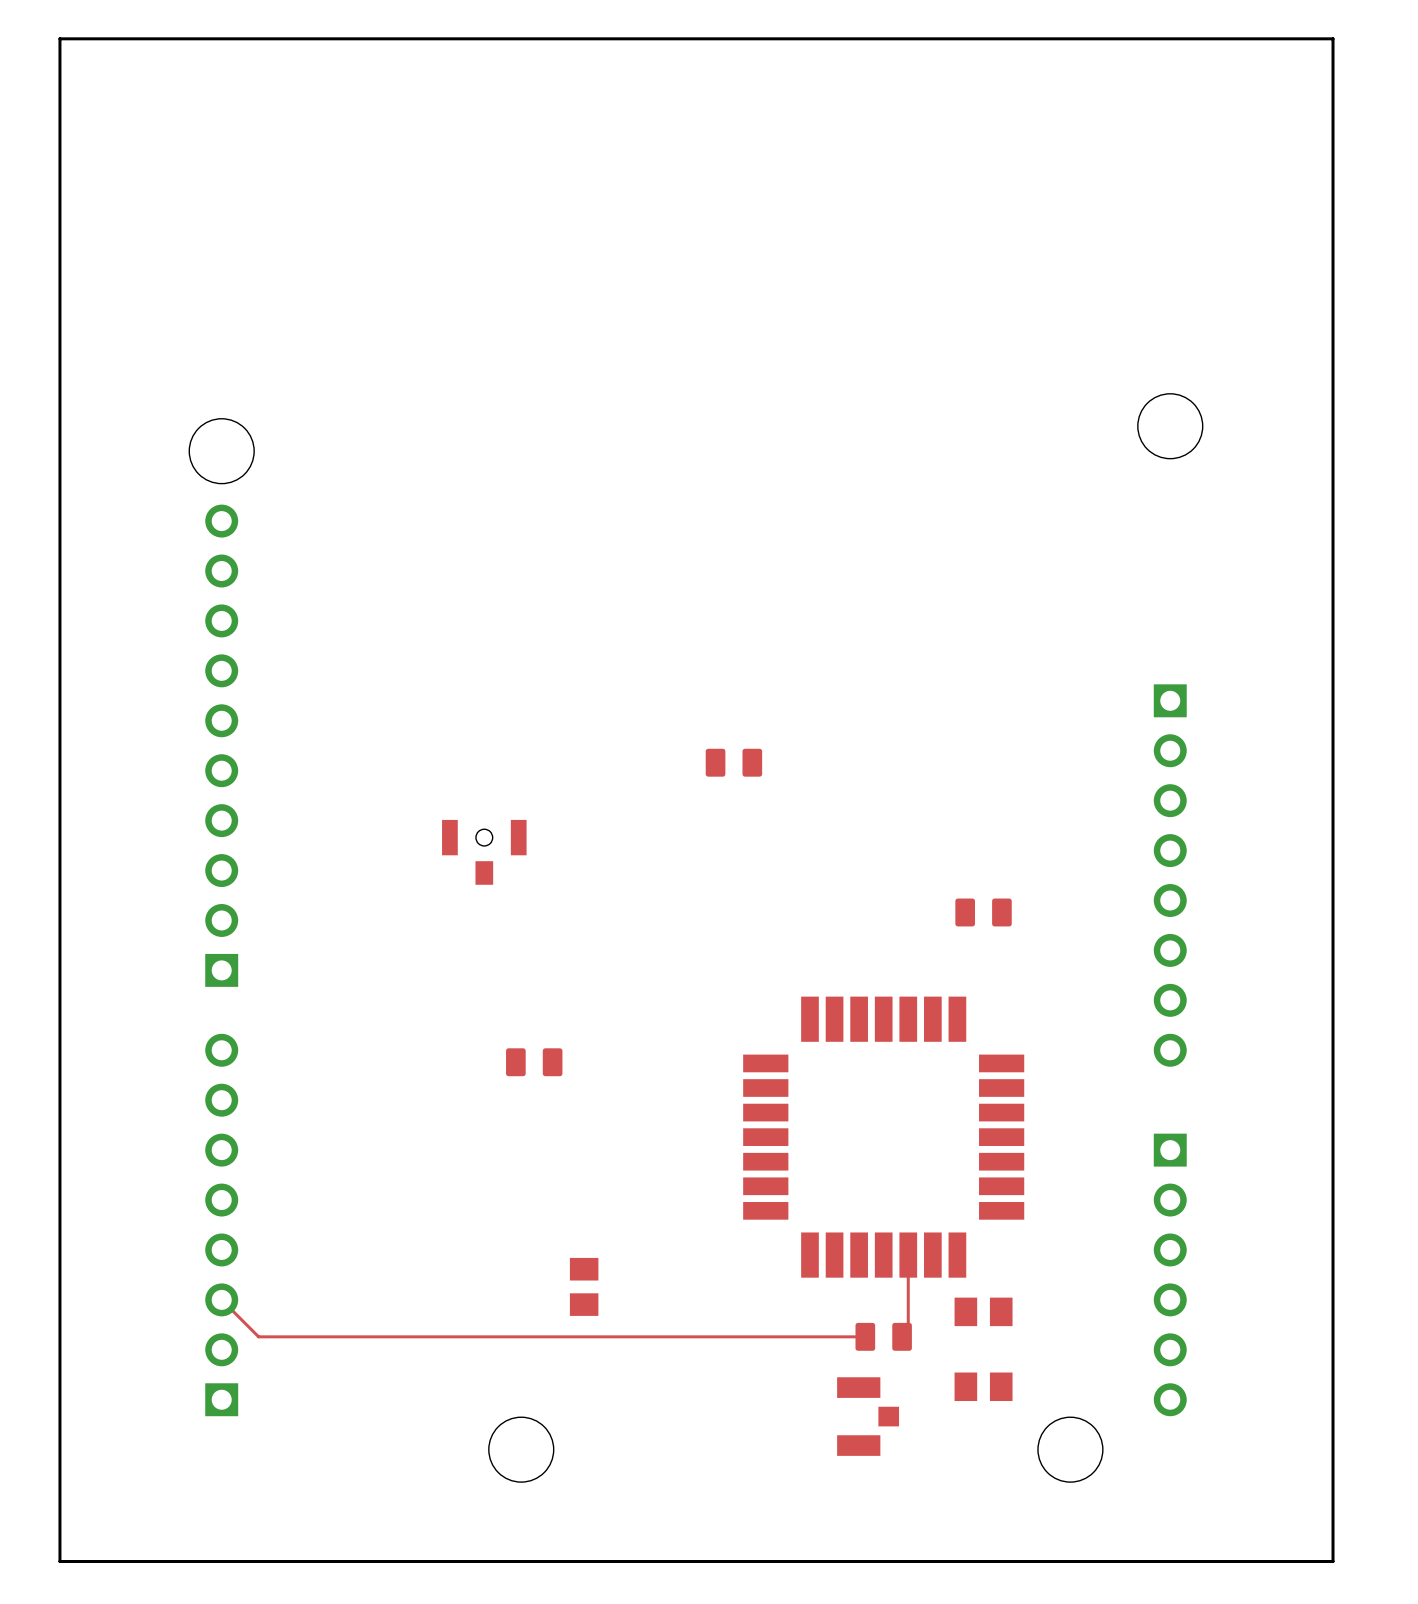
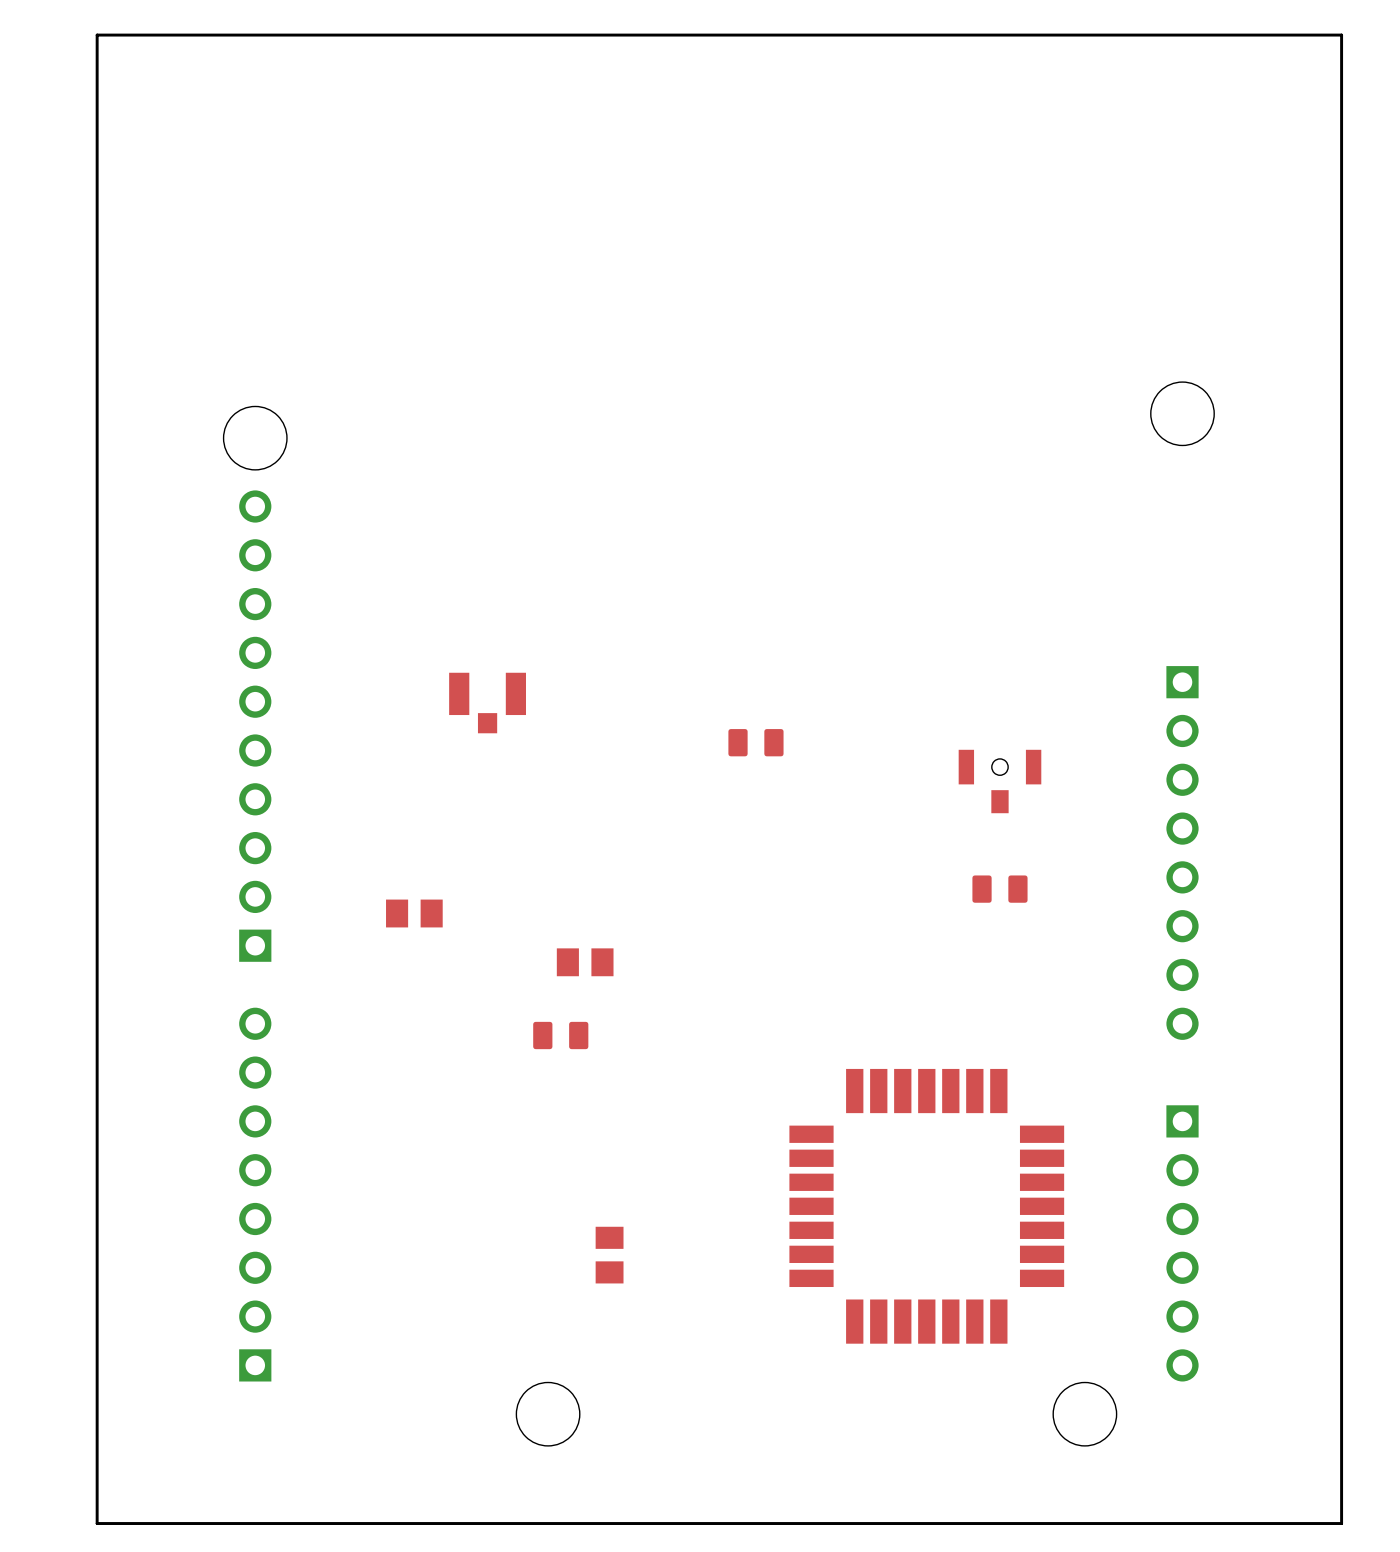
part: none -> (487, 703)
part: none -> (999, 781)
part: (484, 852) -> none
part: none -> (414, 913)
part: none -> (585, 962)
part position: (883, 1137) -> (926, 1206)
top track: (908, 1255) (908, 1330) (902, 1336) -> none
top track: (221, 1299) (258, 1336) (865, 1336) -> none
part: (983, 1311) -> none
part: (883, 1336) -> none
part: (983, 1386) -> none
part: (868, 1416) -> none

